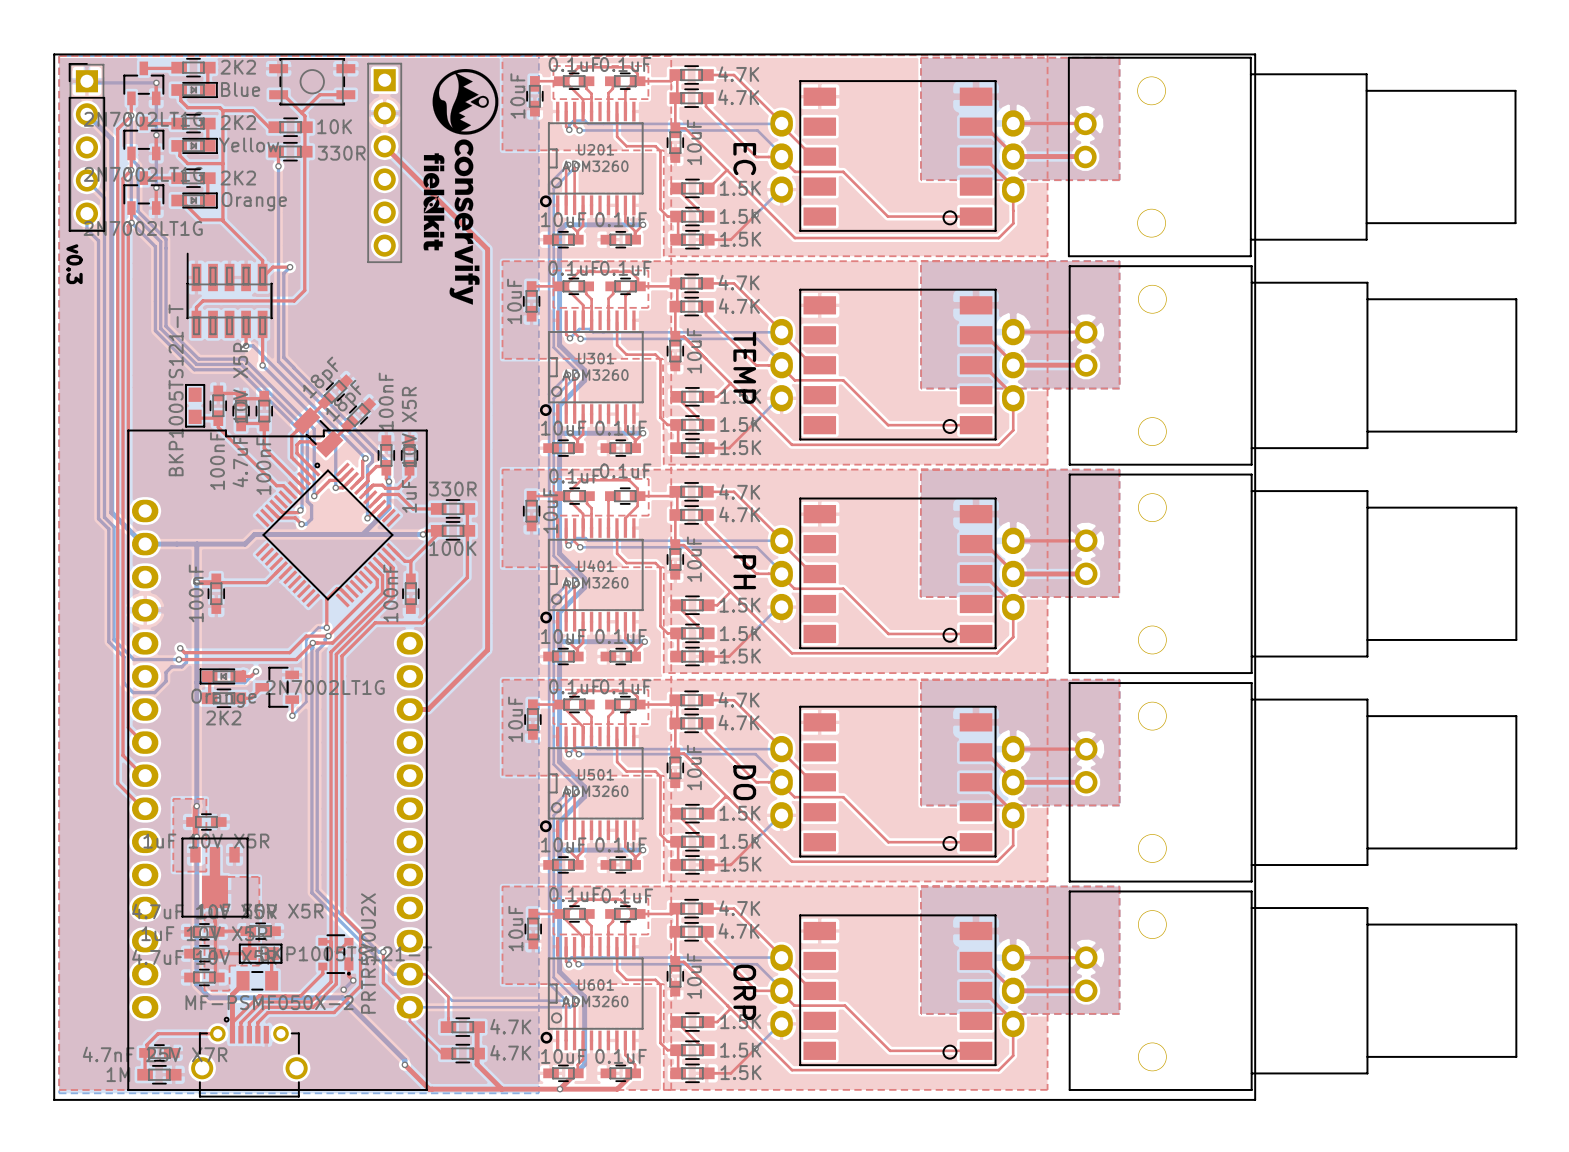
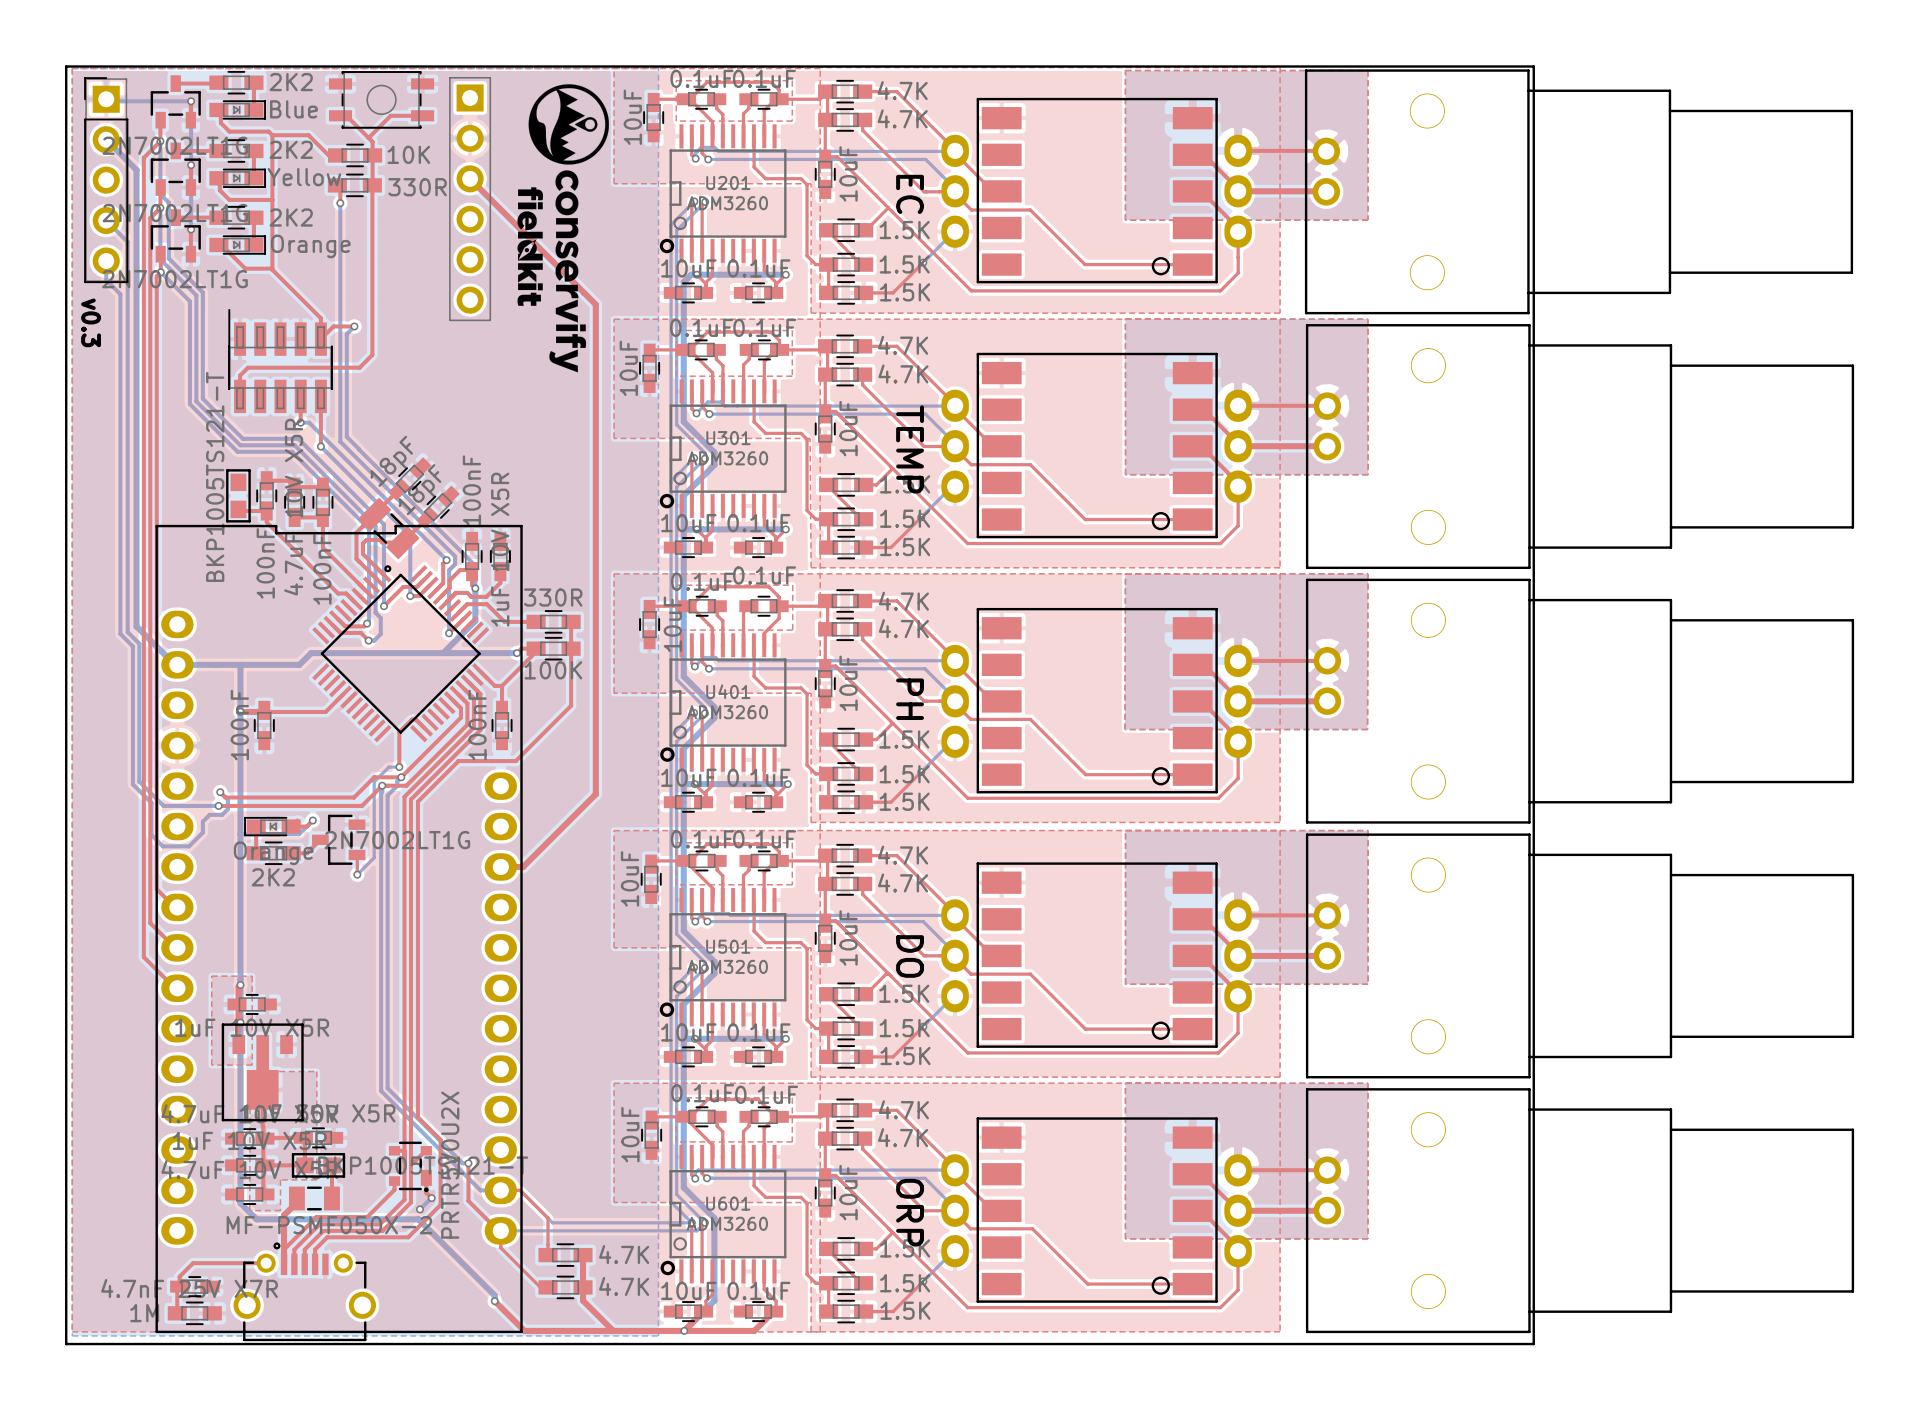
part footprint: [1067, 56, 1517, 258] -> [1304, 69, 1854, 315]
part footprint: [1068, 265, 1518, 466] -> [1305, 324, 1855, 570]
part footprint: [1068, 473, 1518, 675] -> [1305, 578, 1855, 824]
part footprint: [1068, 682, 1518, 883] -> [1305, 833, 1855, 1079]
part footprint: [1068, 890, 1518, 1091] -> [1305, 1088, 1855, 1334]

